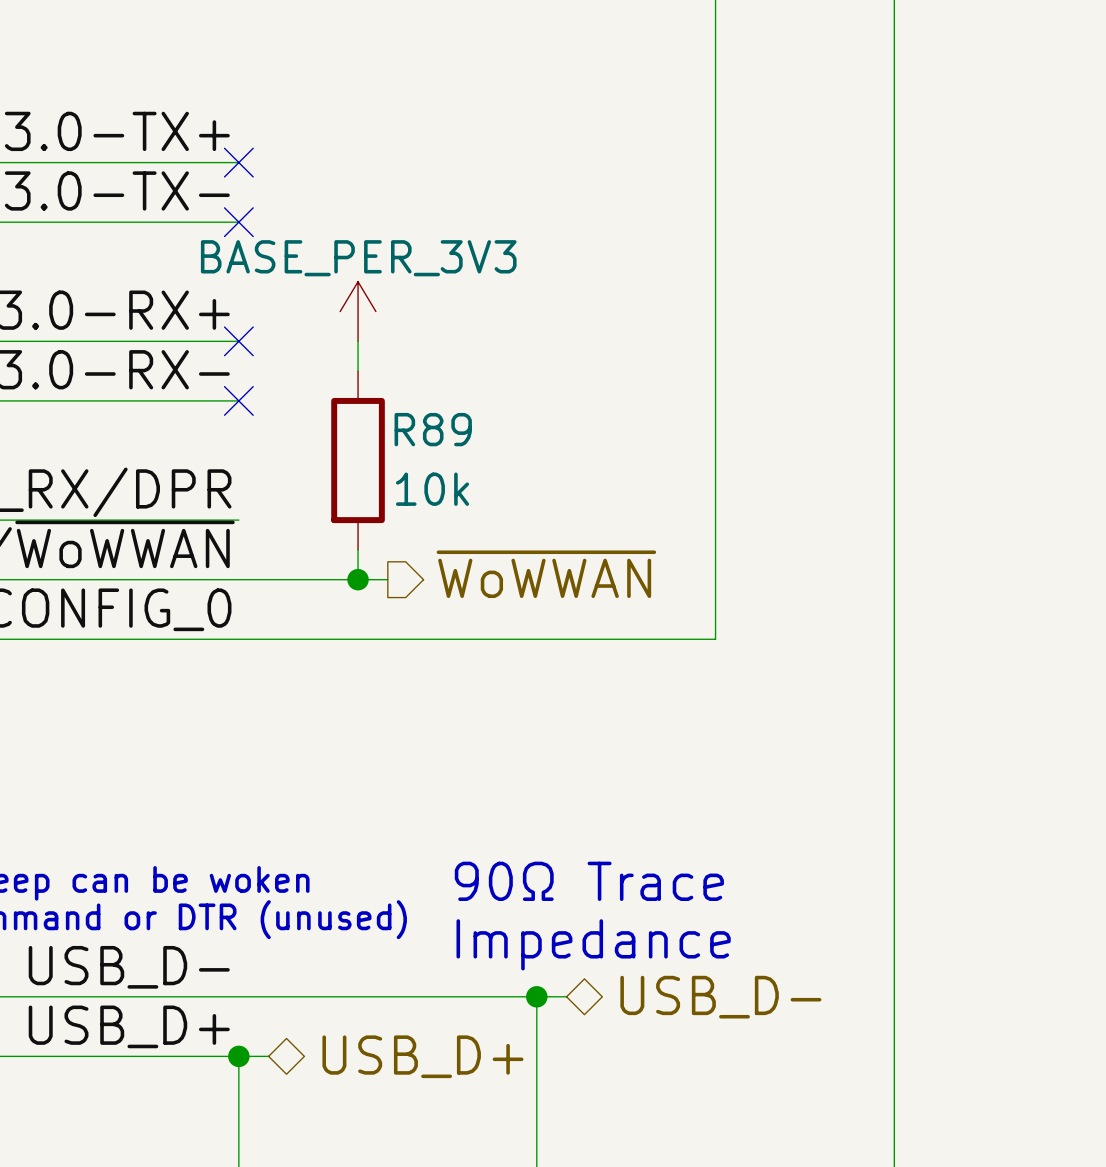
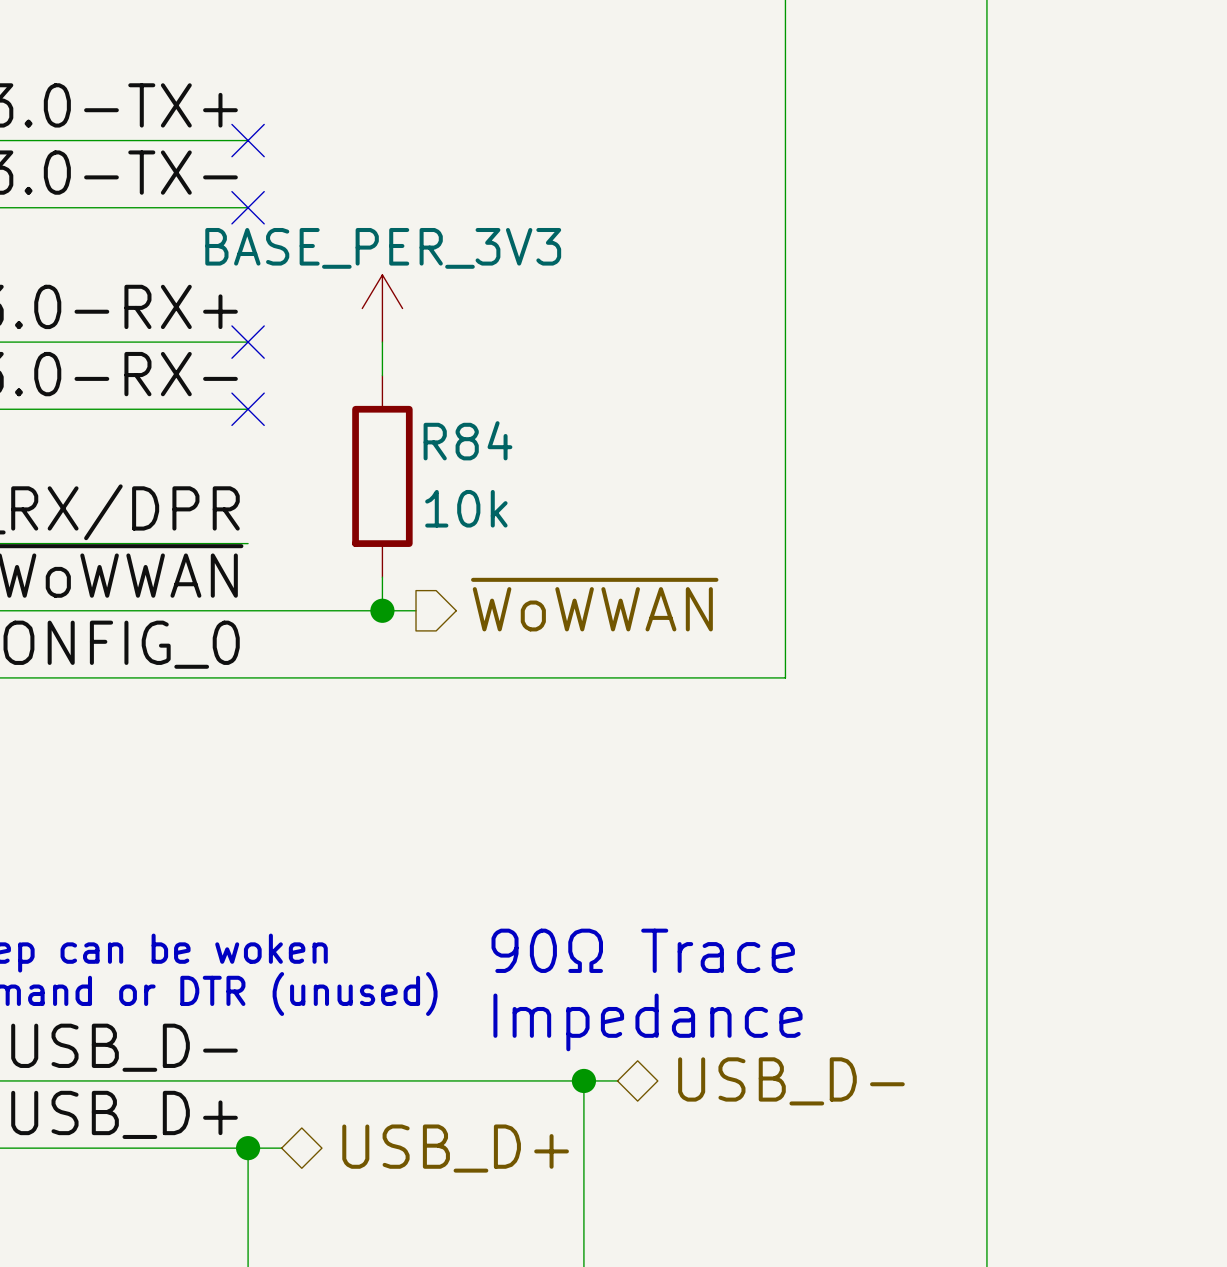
R89 name: R89 (433, 429) -> R84 (467, 440)

